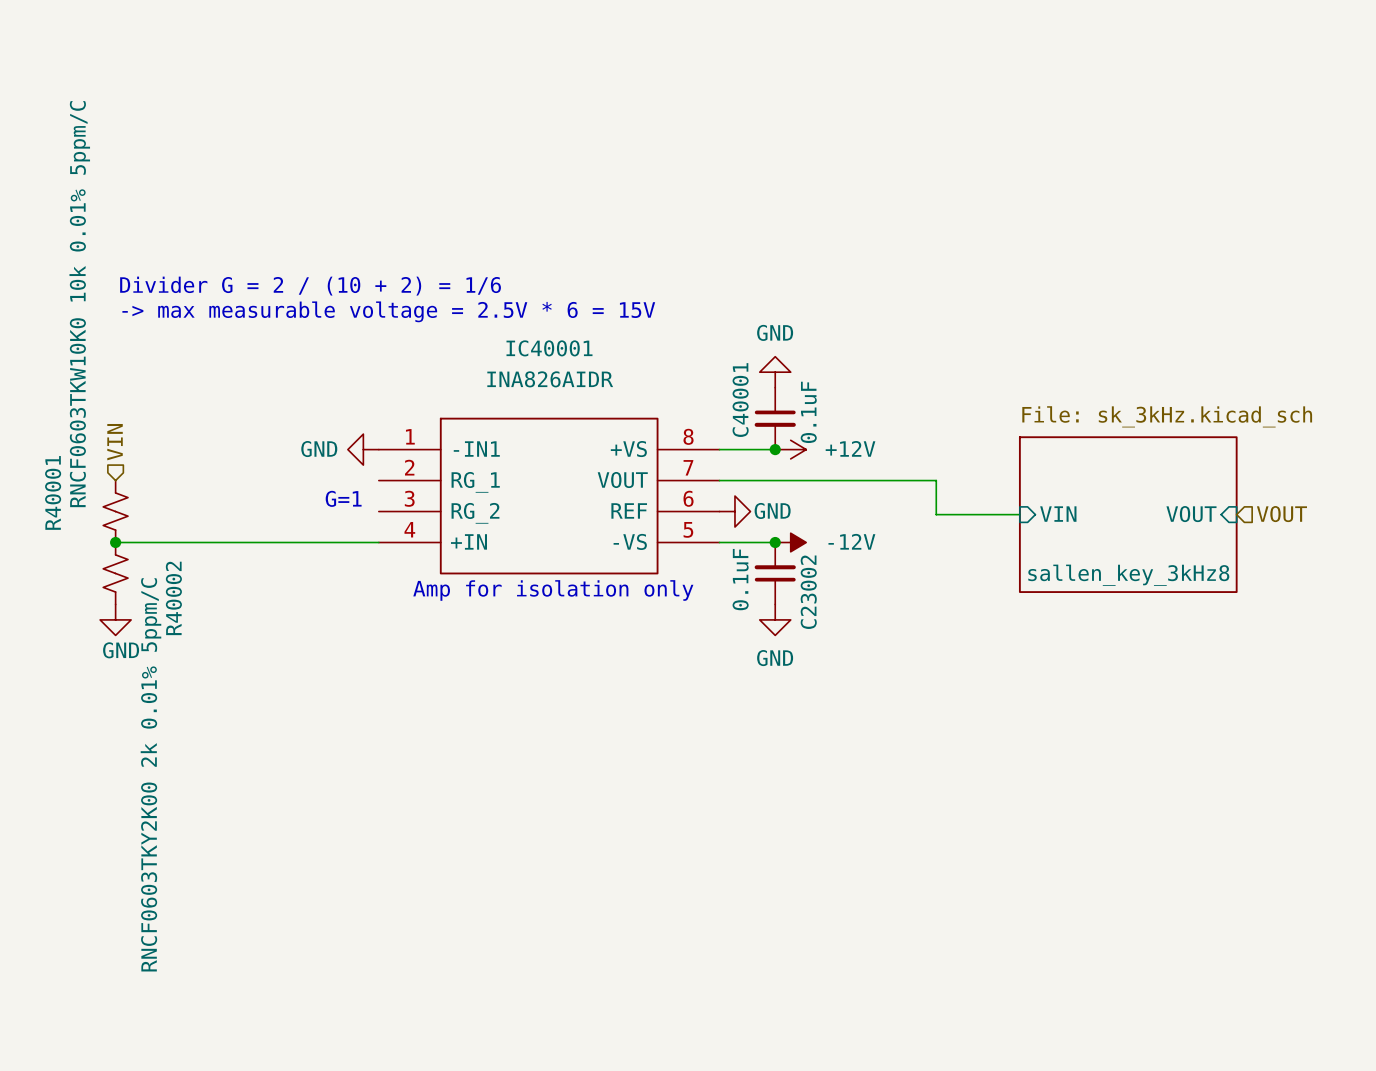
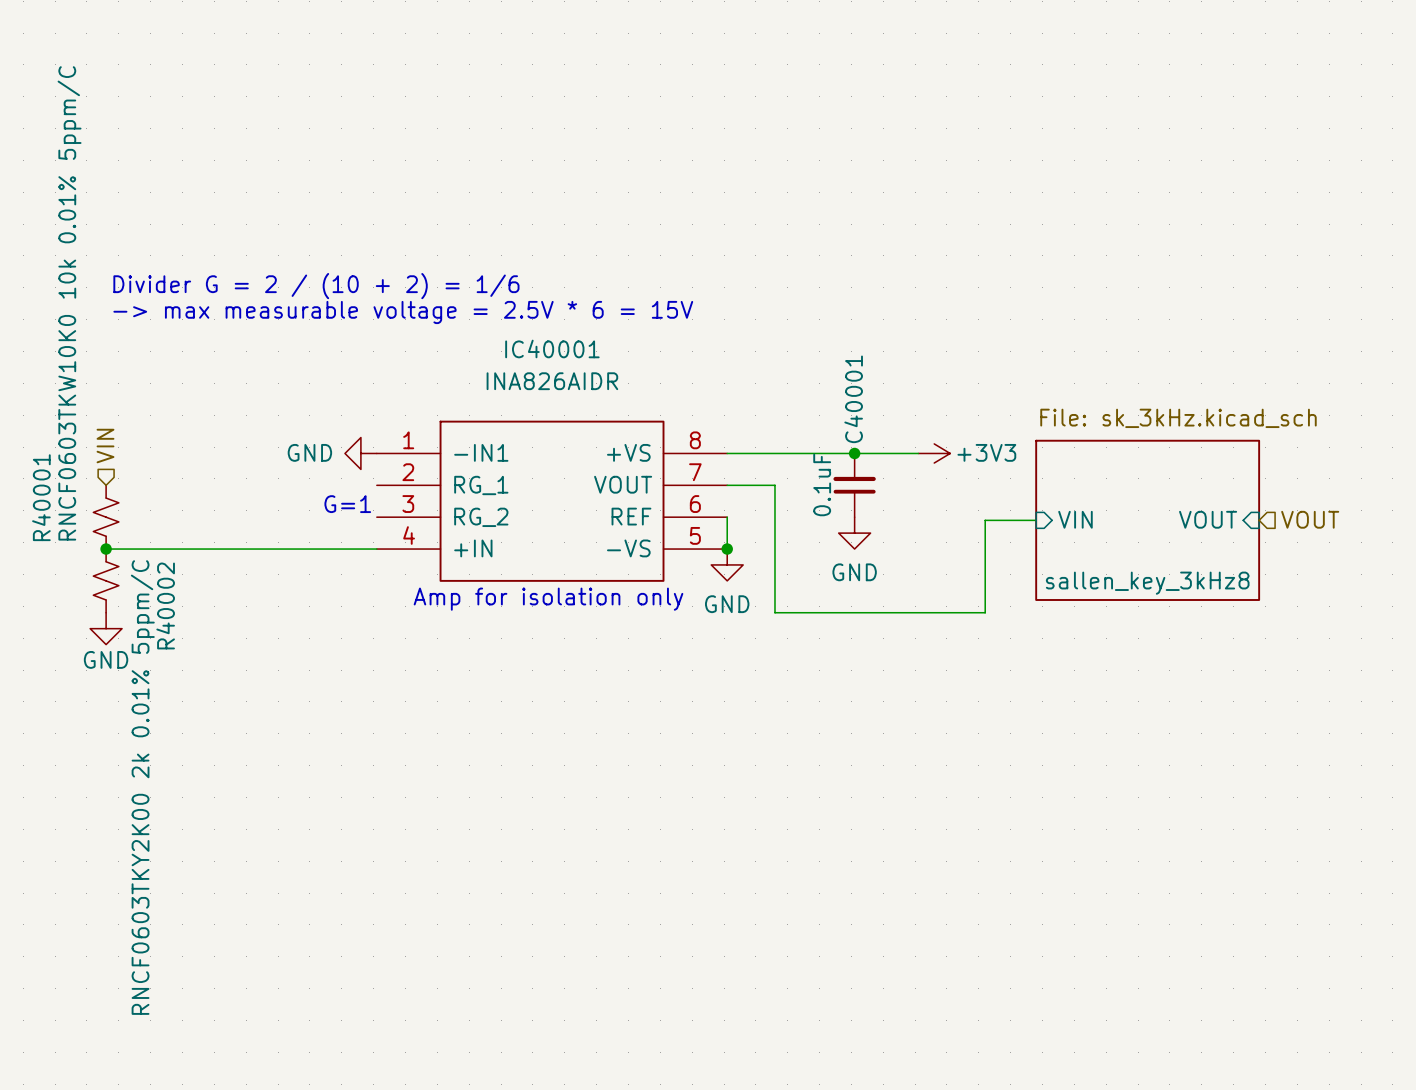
power symbol: GND (775, 372) -> none
C40001 name position: C40001 (740, 400) -> C40001 (853, 399)
C40001 rotation: 0° (775, 418) -> 180° (854, 485)
C40001 position: (775, 418) -> (854, 485)
wire: none -> (784, 453) (918, 453)
junction: (775, 449) -> none
power symbol: +12V (790, 449) -> none
junction: none -> (854, 453)
power symbol: none -> +3V3 (934, 453)
wire: (765, 480) (936, 480) (936, 514) (970, 514) -> (774, 485) (774, 612) (985, 612) (985, 520)
power symbol: GND (734, 511) -> none
power symbol: none -> GND (854, 533)
wire: (719, 542) (775, 542) -> (727, 549) (727, 517)
junction: none -> (727, 549)
junction: (775, 542) -> none
power symbol: -12V (790, 542) -> none
power symbol: none -> GND (727, 564)
C23002: 0.1uF (775, 573) -> none
power symbol: GND (775, 619) -> none

